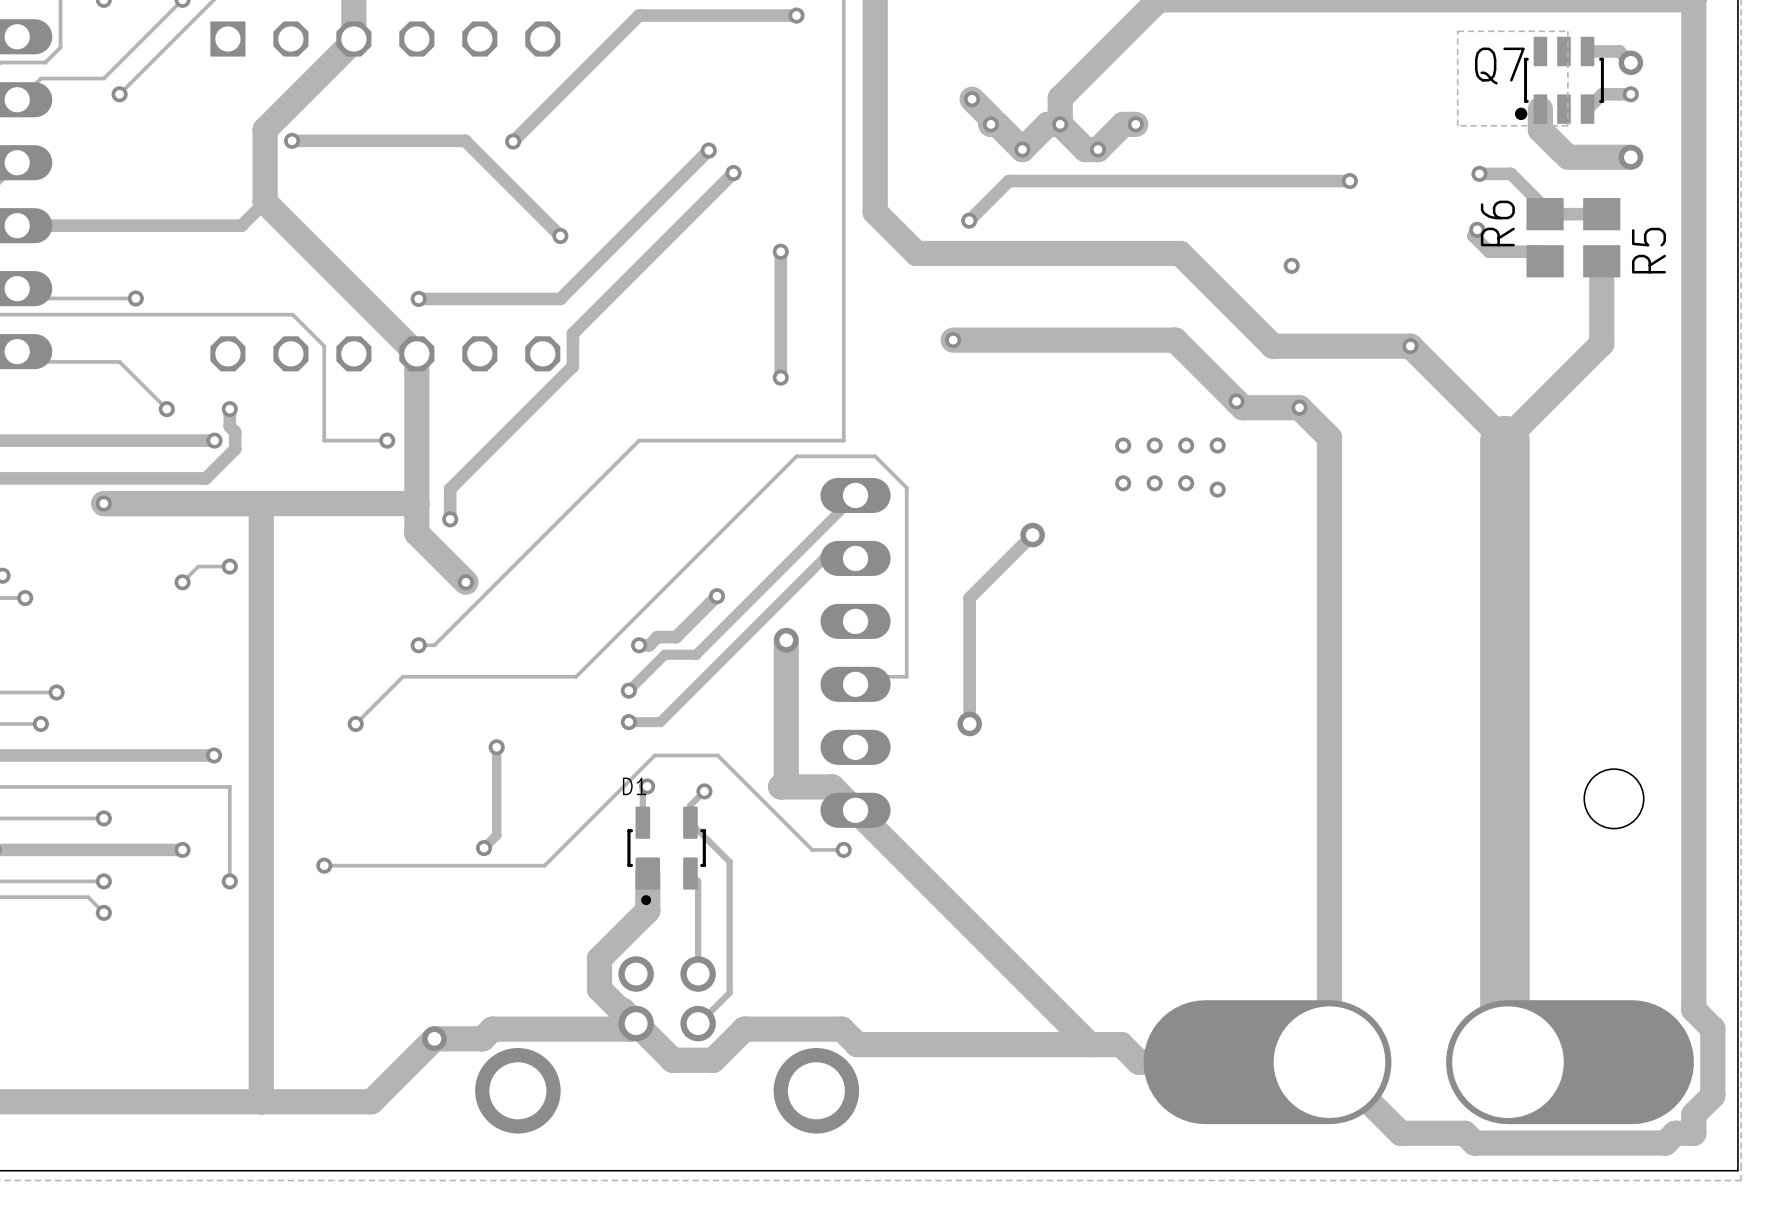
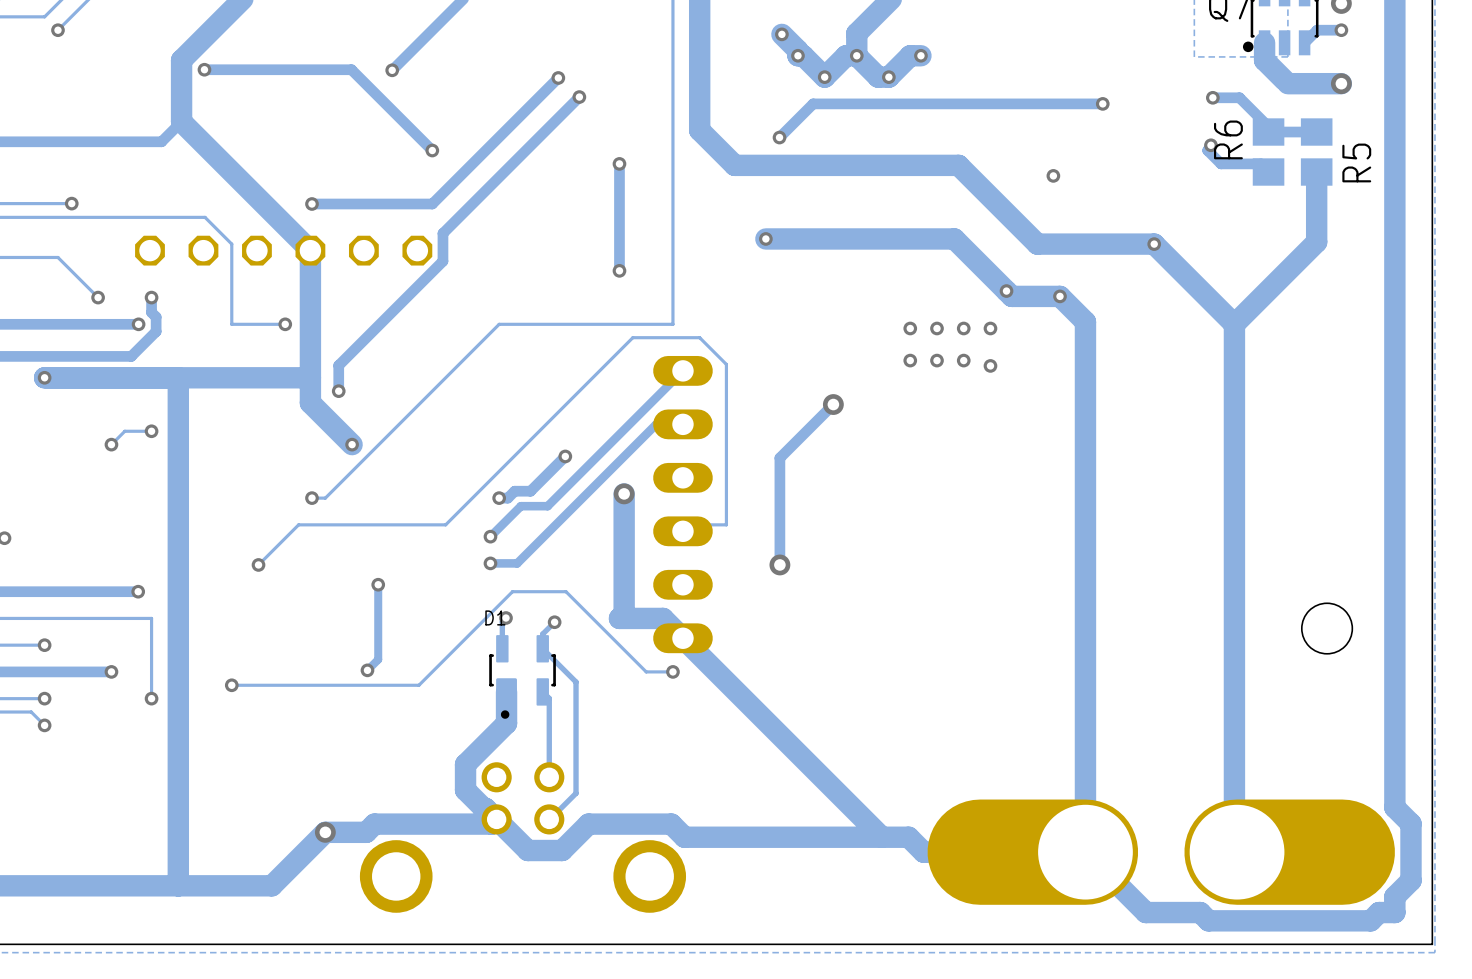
track width: thick (1504, 440) (1504, 1059) -> thin (1234, 324) (1234, 849)

